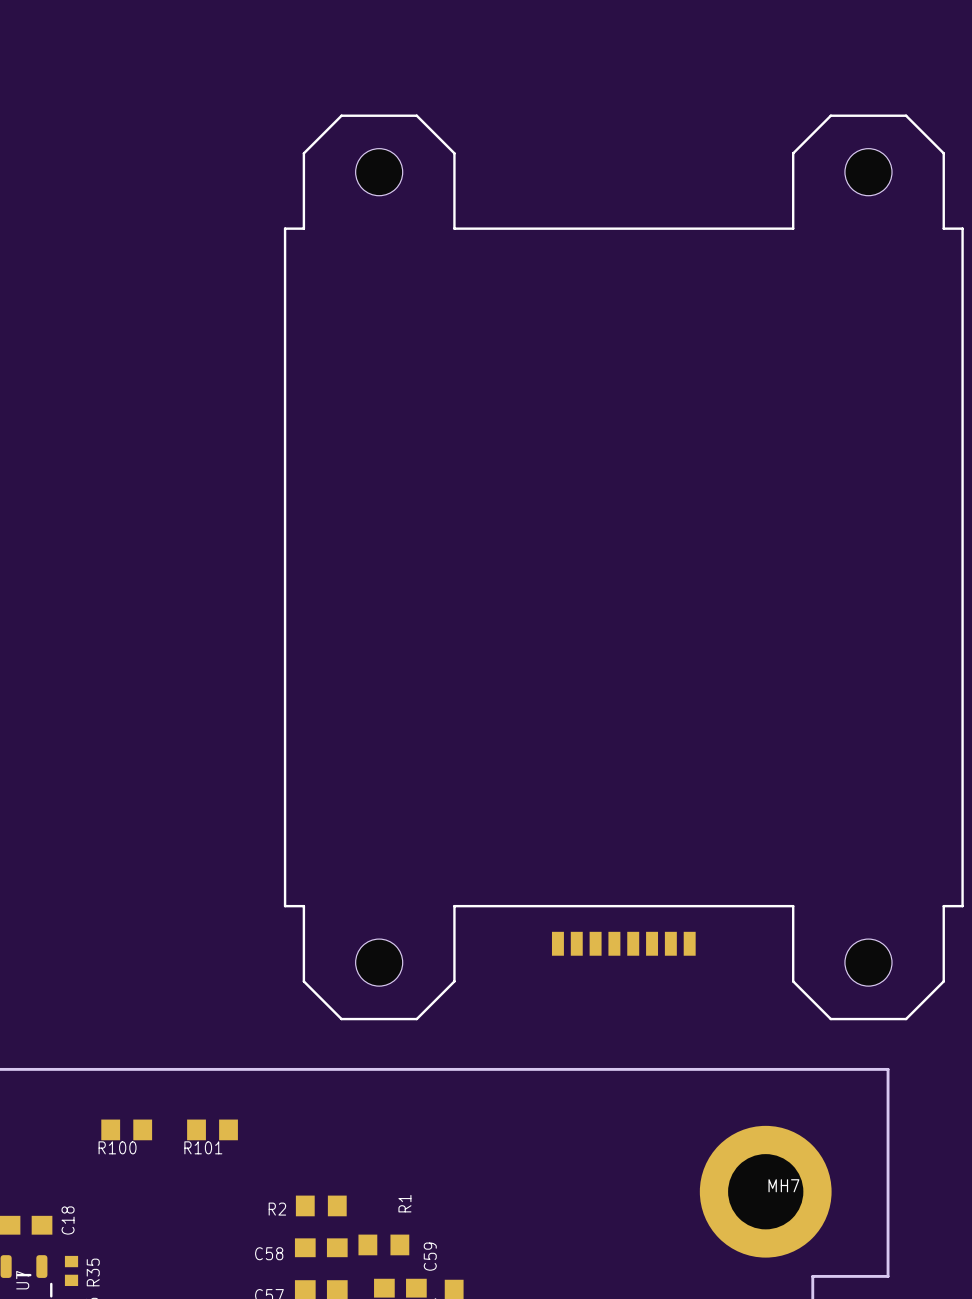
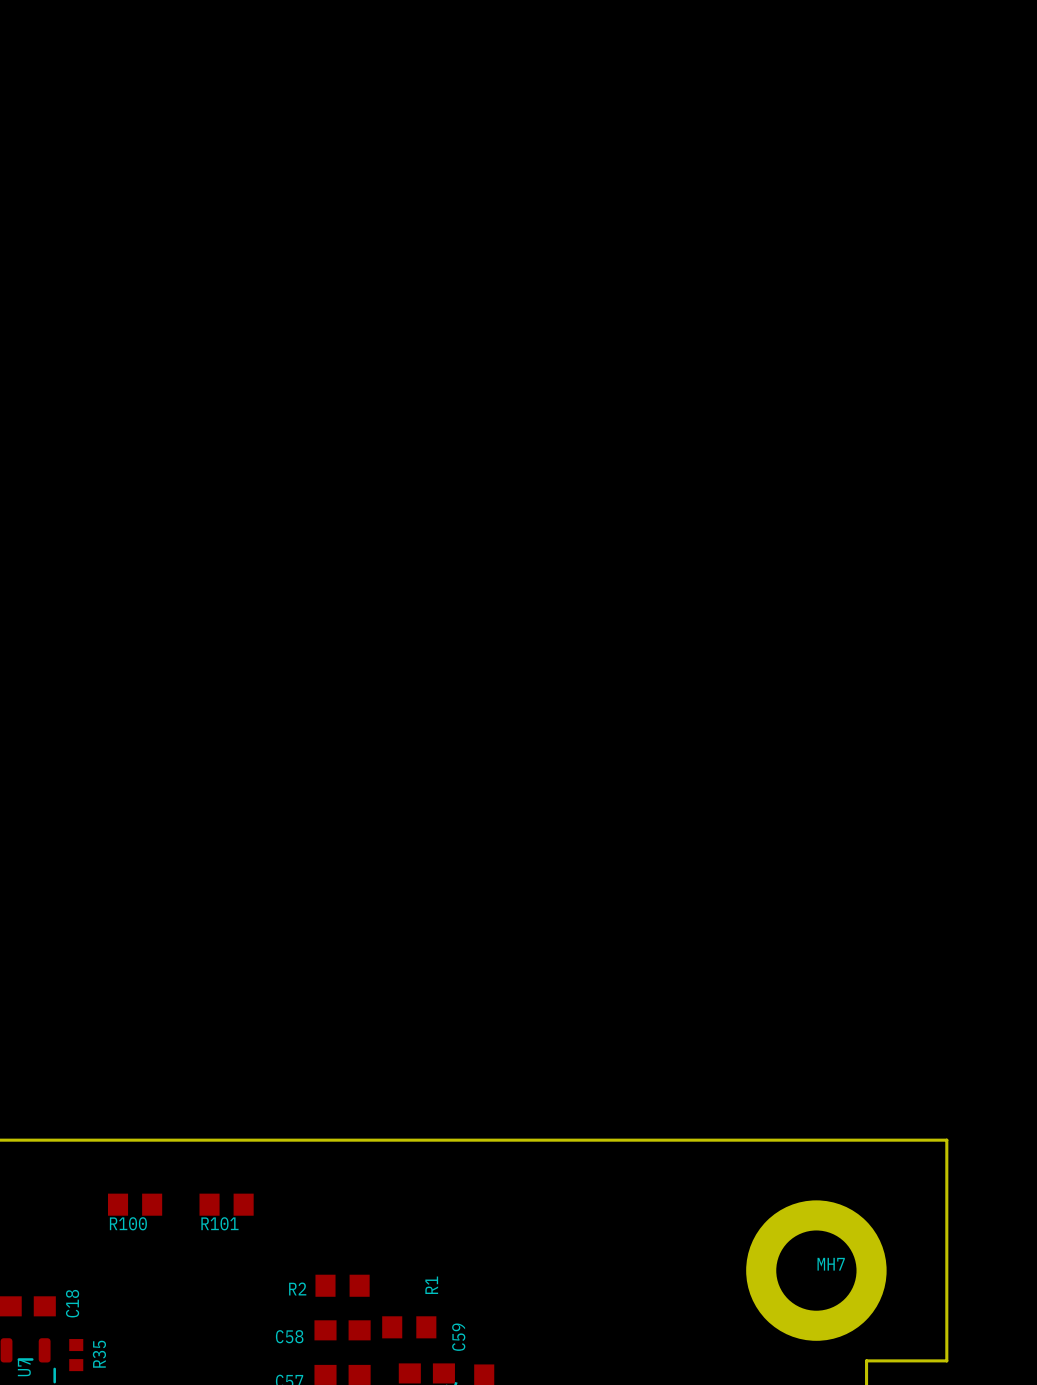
part: (623, 567) -> none

